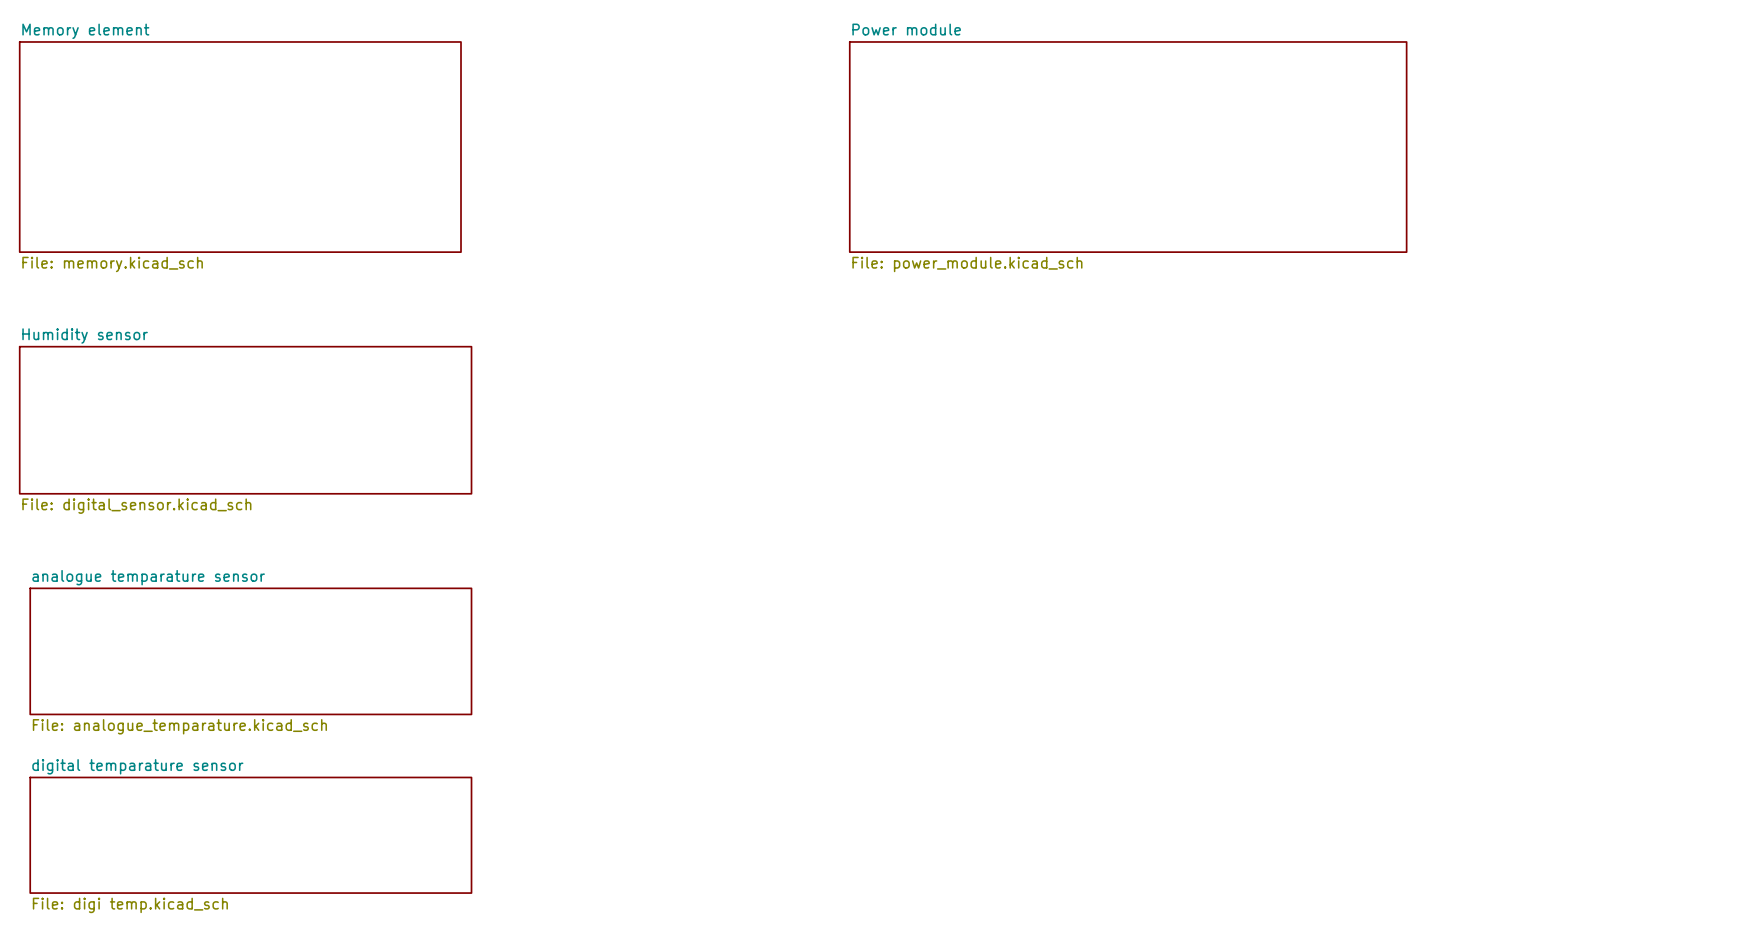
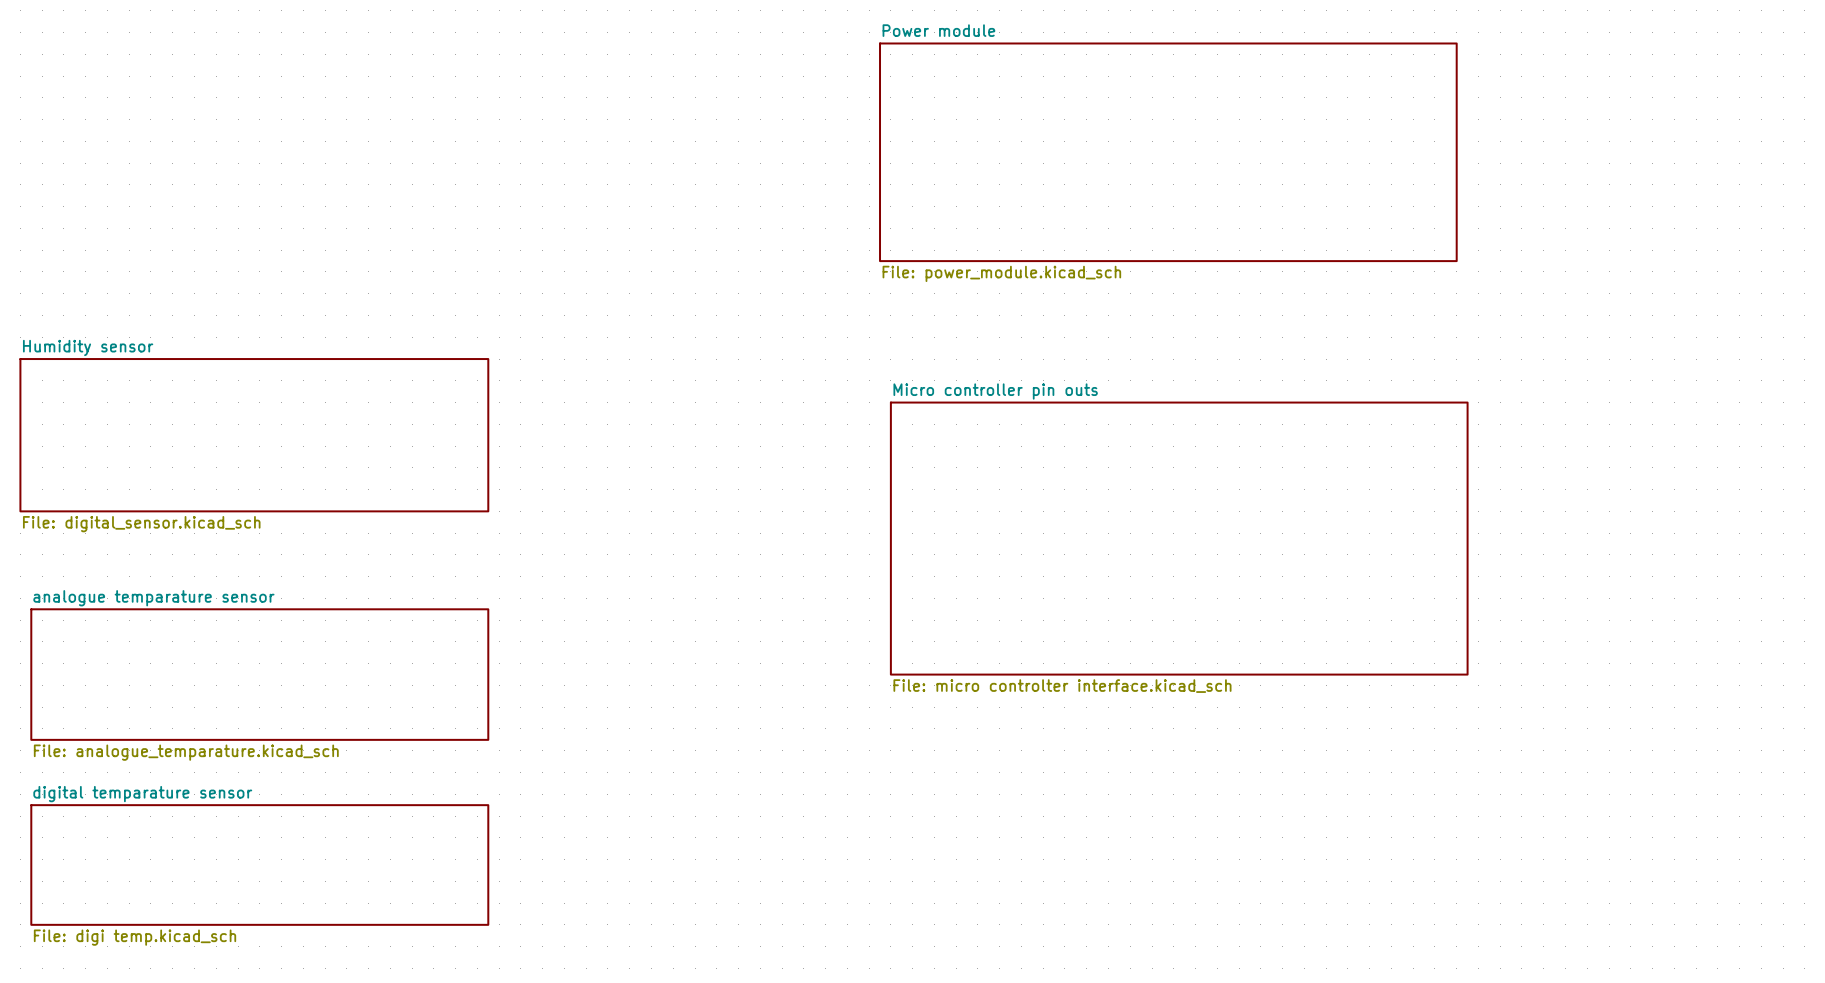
sheet Memory element: File: memory.kicad_sch (240, 147) -> none
sheet Micro controller pin outs: none -> File: micro controlter interface.kicad_sch (1179, 538)

